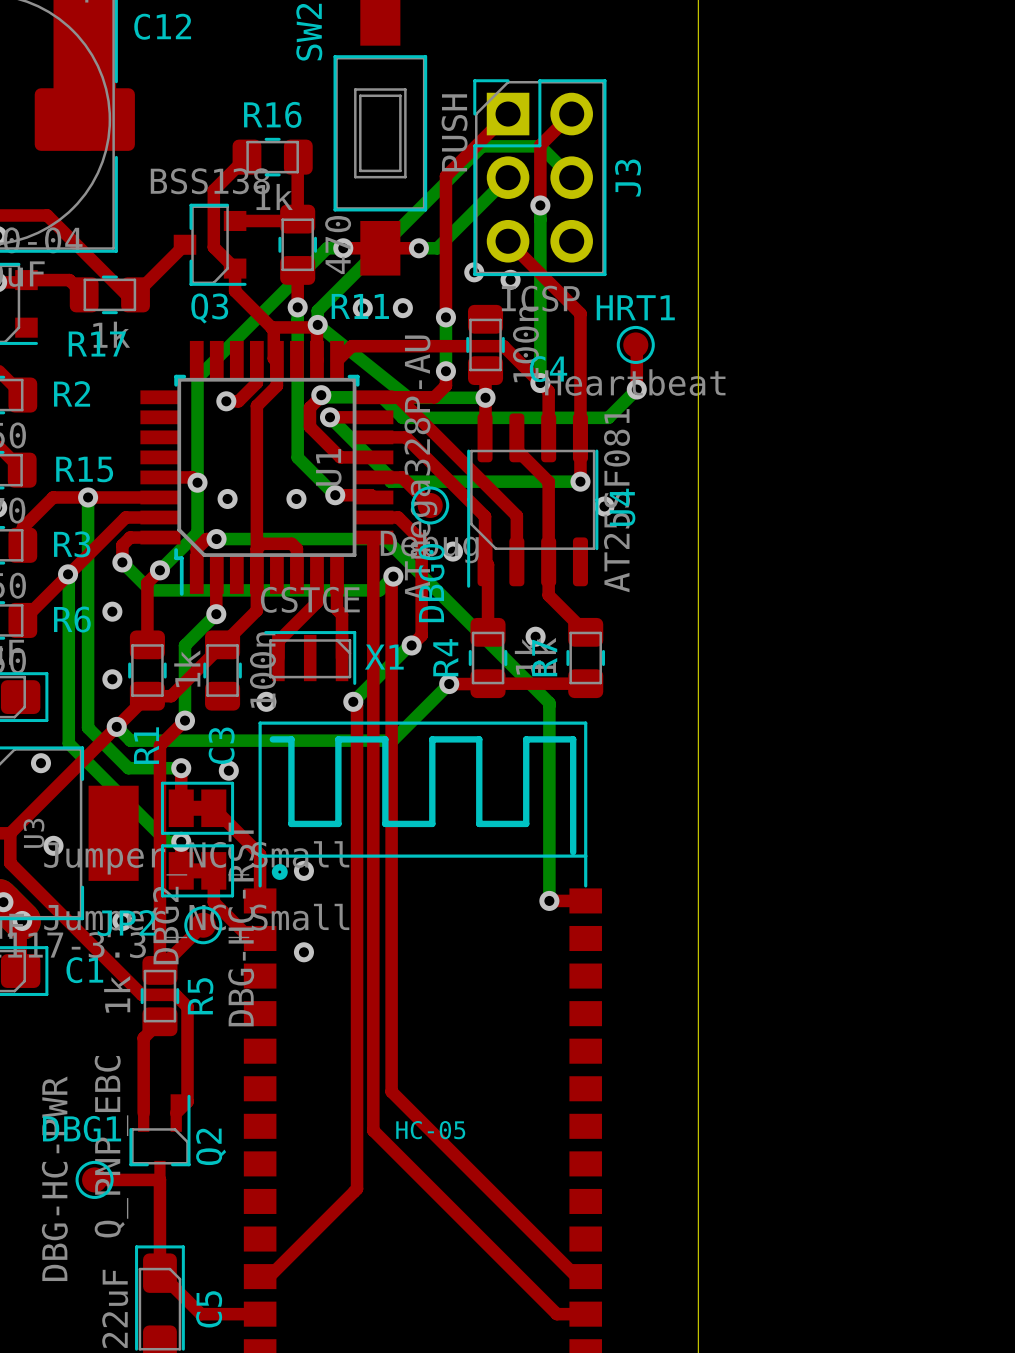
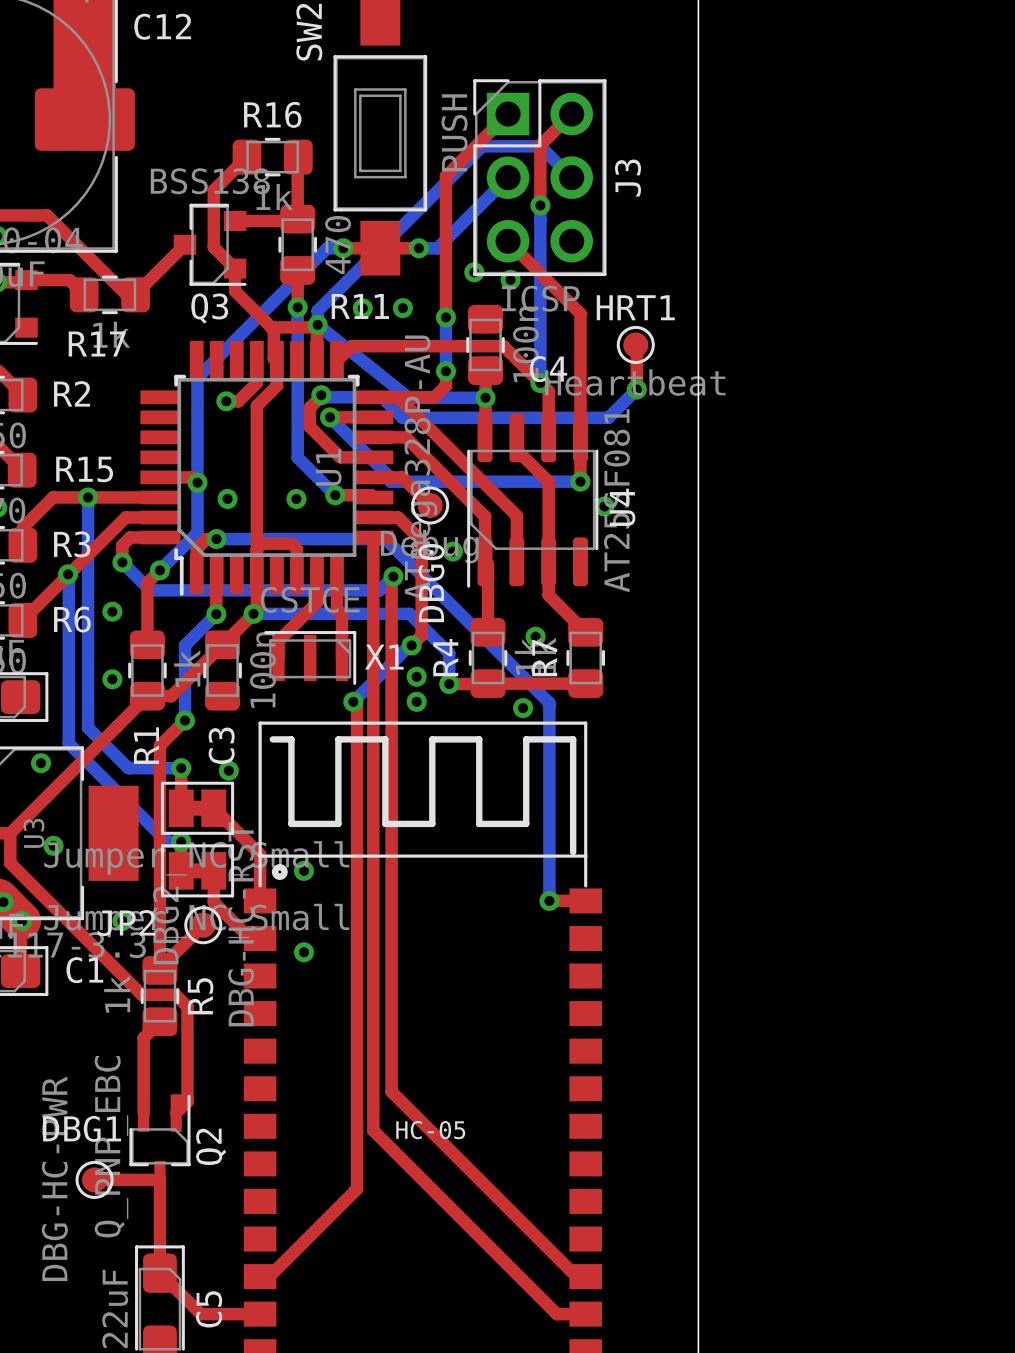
via: none -> (253, 613)
via: none -> (416, 676)
bottom track: (449, 684) (392, 740) (130, 740) (116, 726) -> (449, 684) (449, 653) (409, 613) (253, 613)
via: (266, 701) -> none
via: none -> (416, 701)
via: none -> (523, 708)
via: (116, 726) -> none

